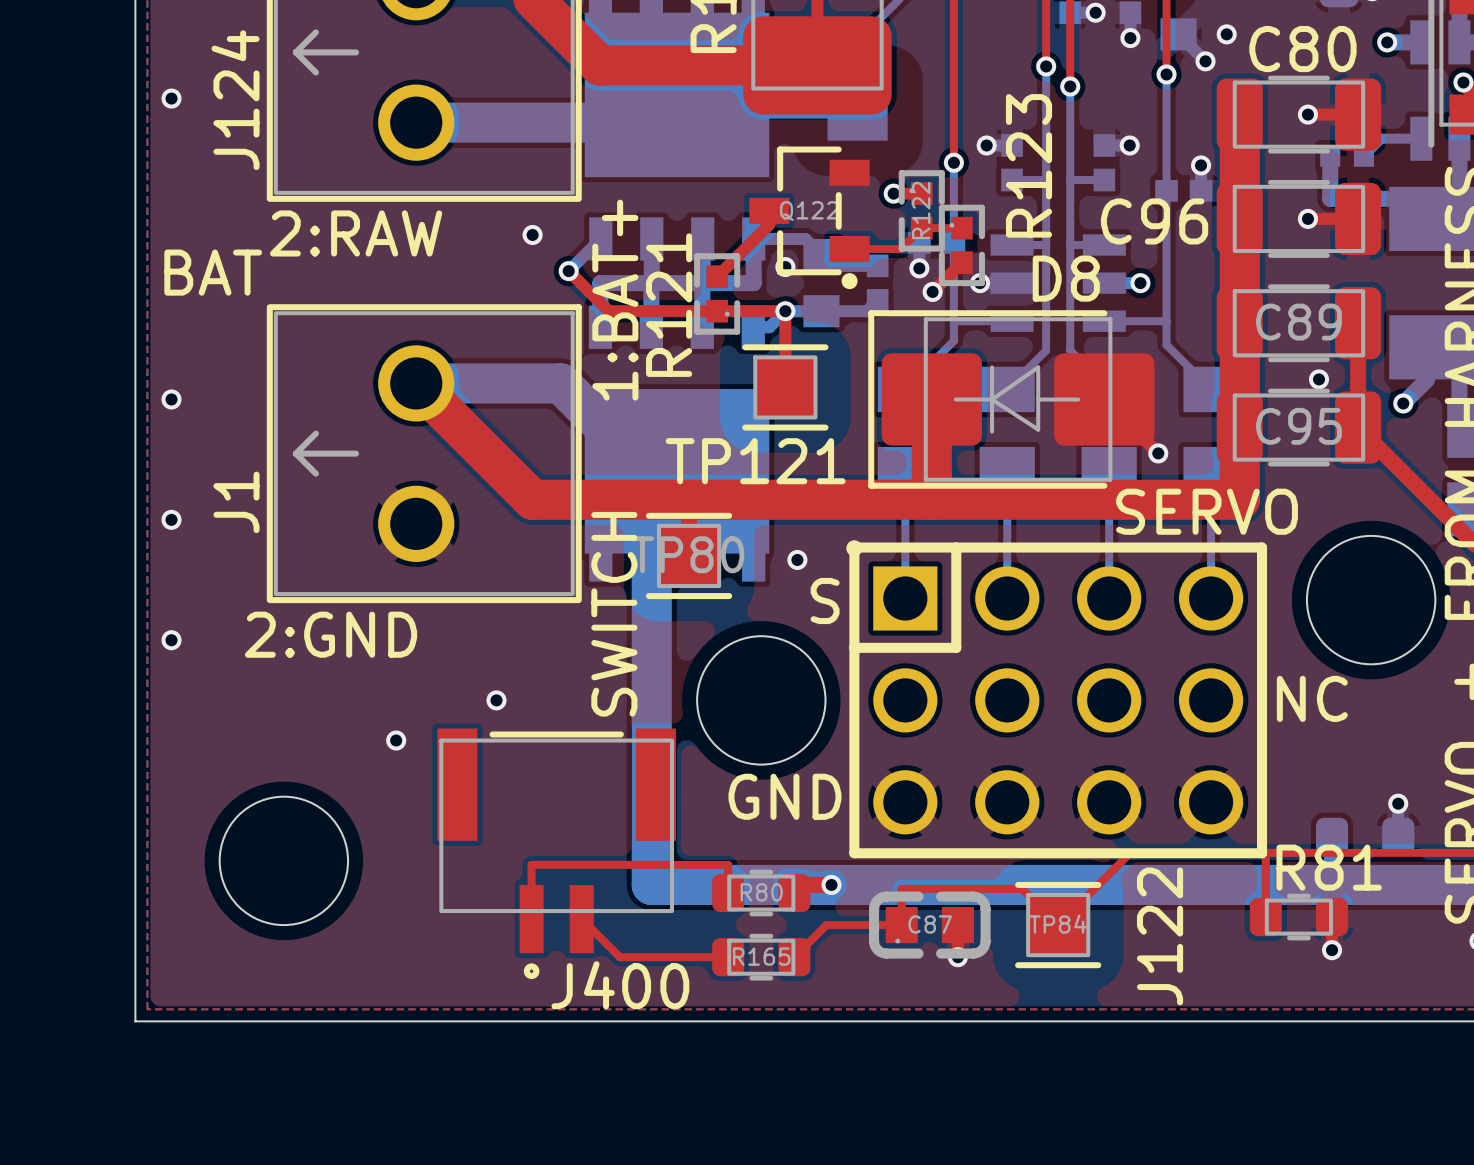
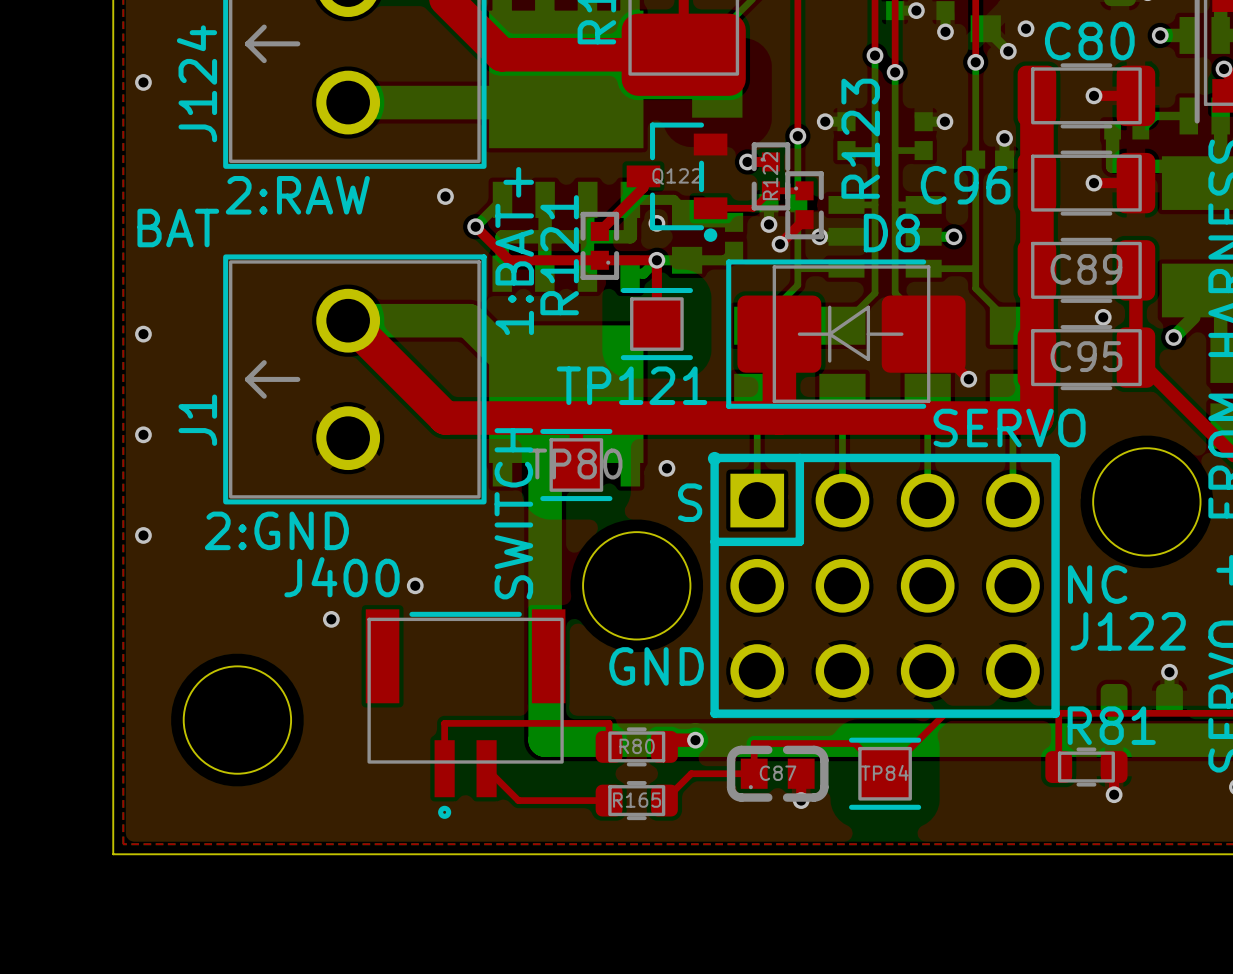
J122 name rotation: 0° (1160, 936) -> 90° clockwise (1128, 631)
J122 name position: J122 (1160, 936) -> J122 (1128, 631)
J400 name position: J400 (620, 985) -> J400 (342, 577)

